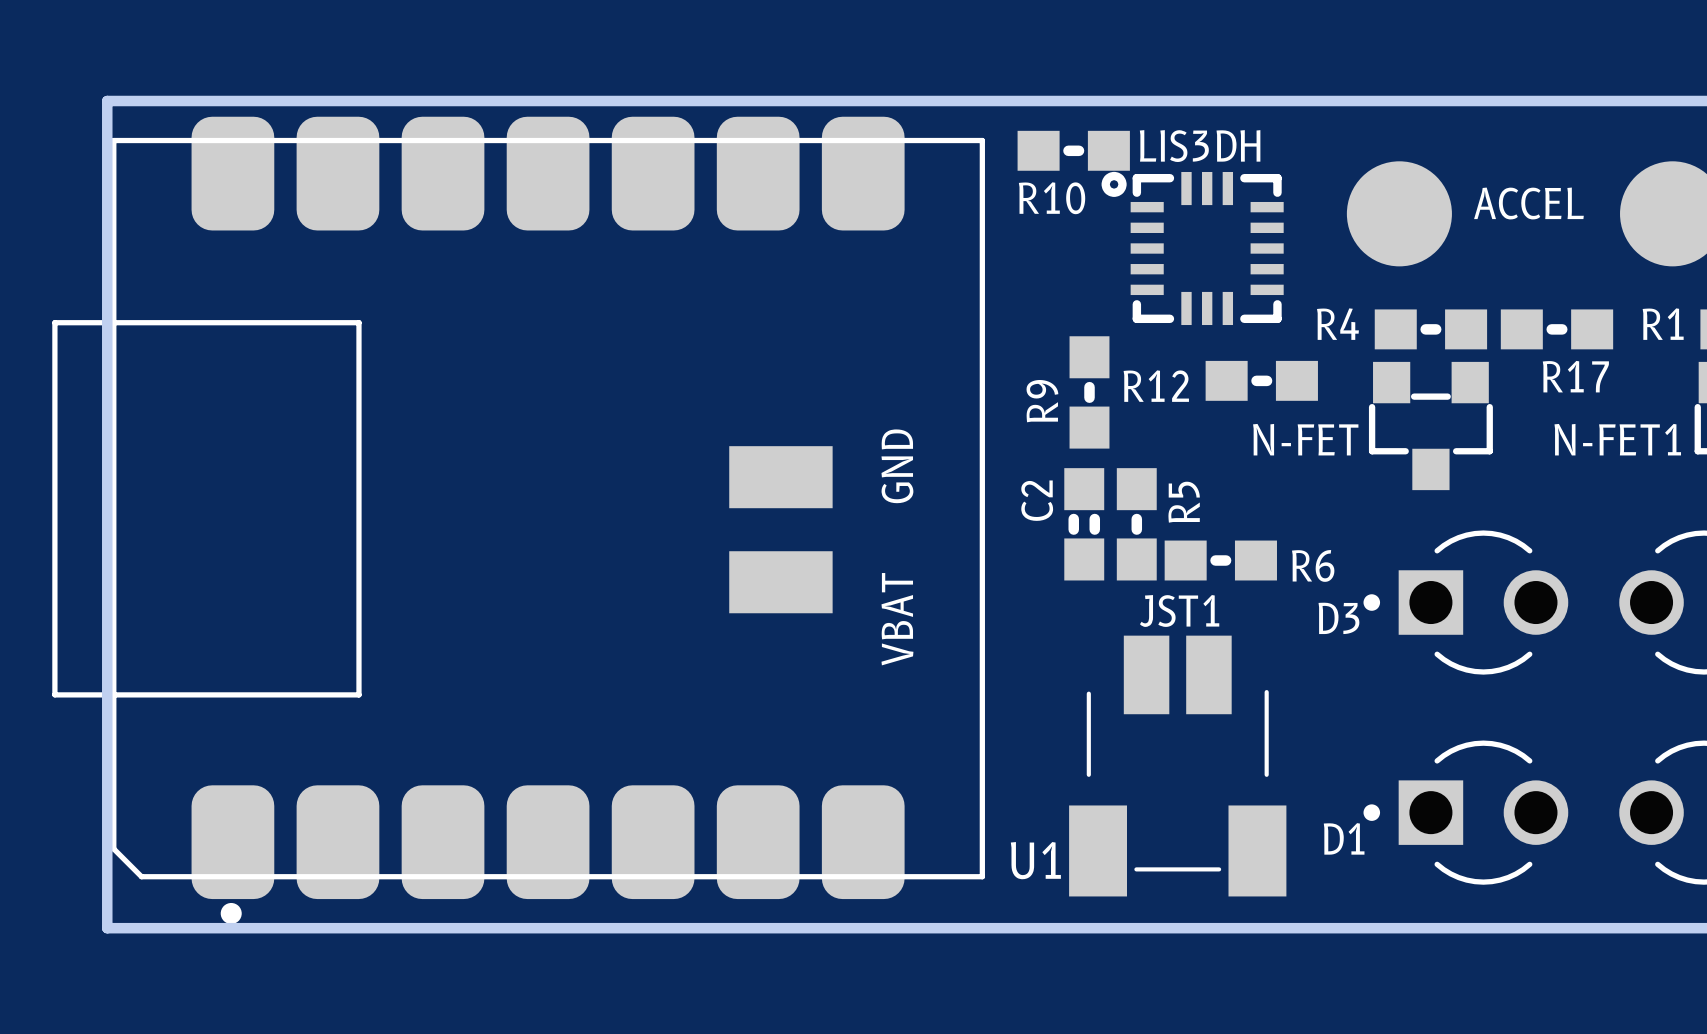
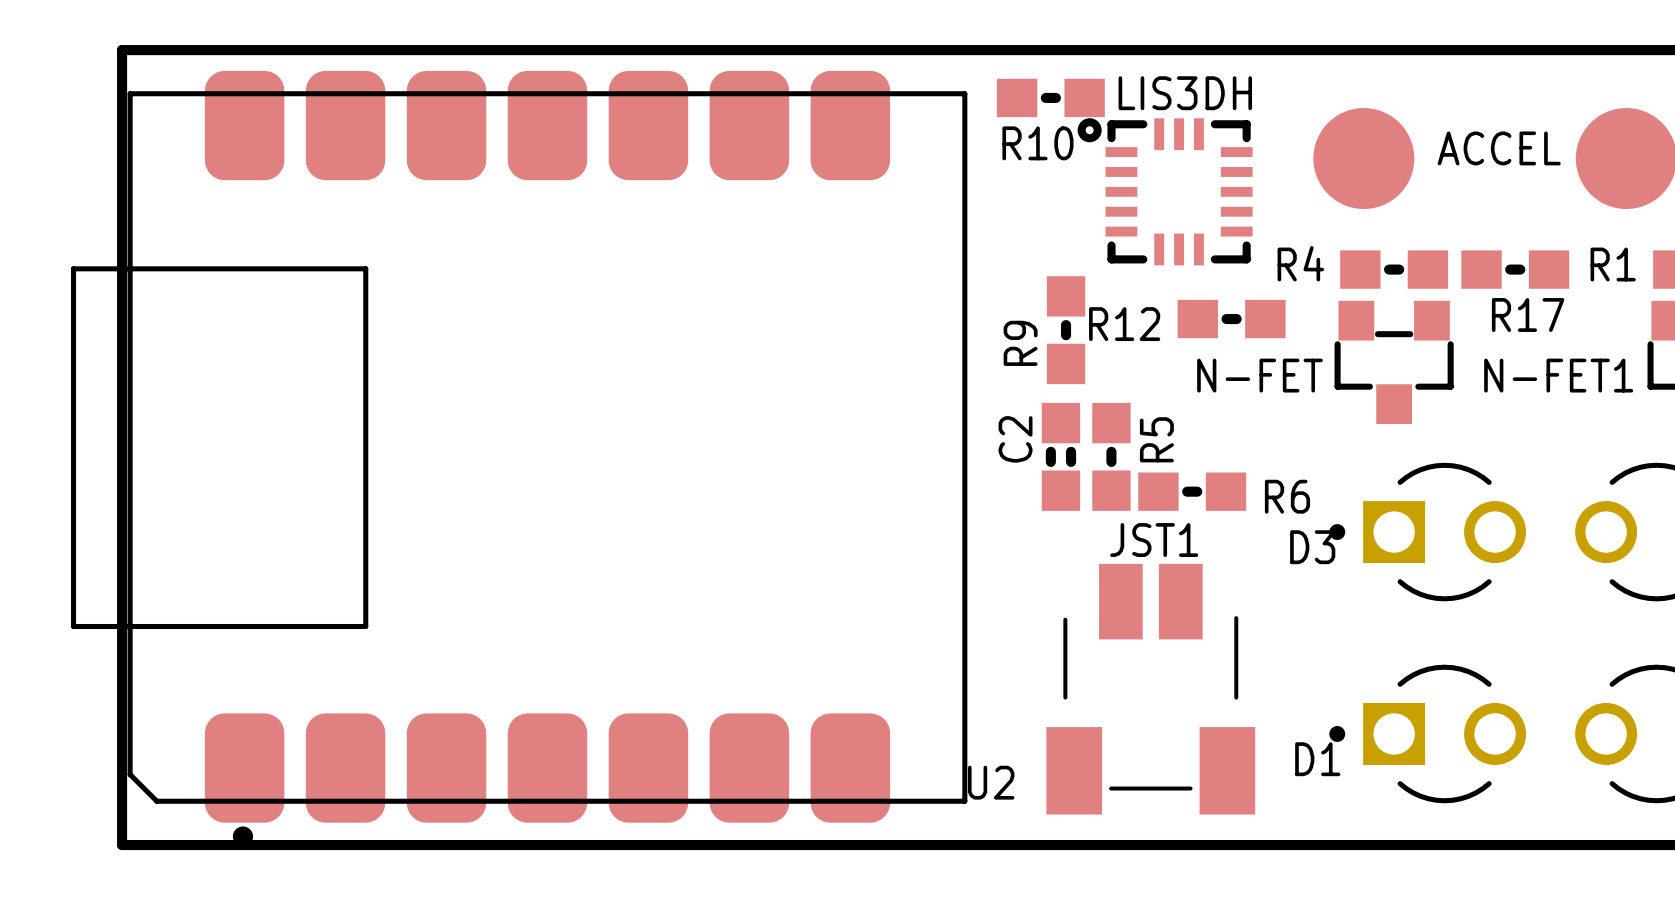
text: GND (897, 466) -> none
U1: (518, 520) -> none
U2: none -> (519, 458)
text: VBAT (897, 619) -> none

